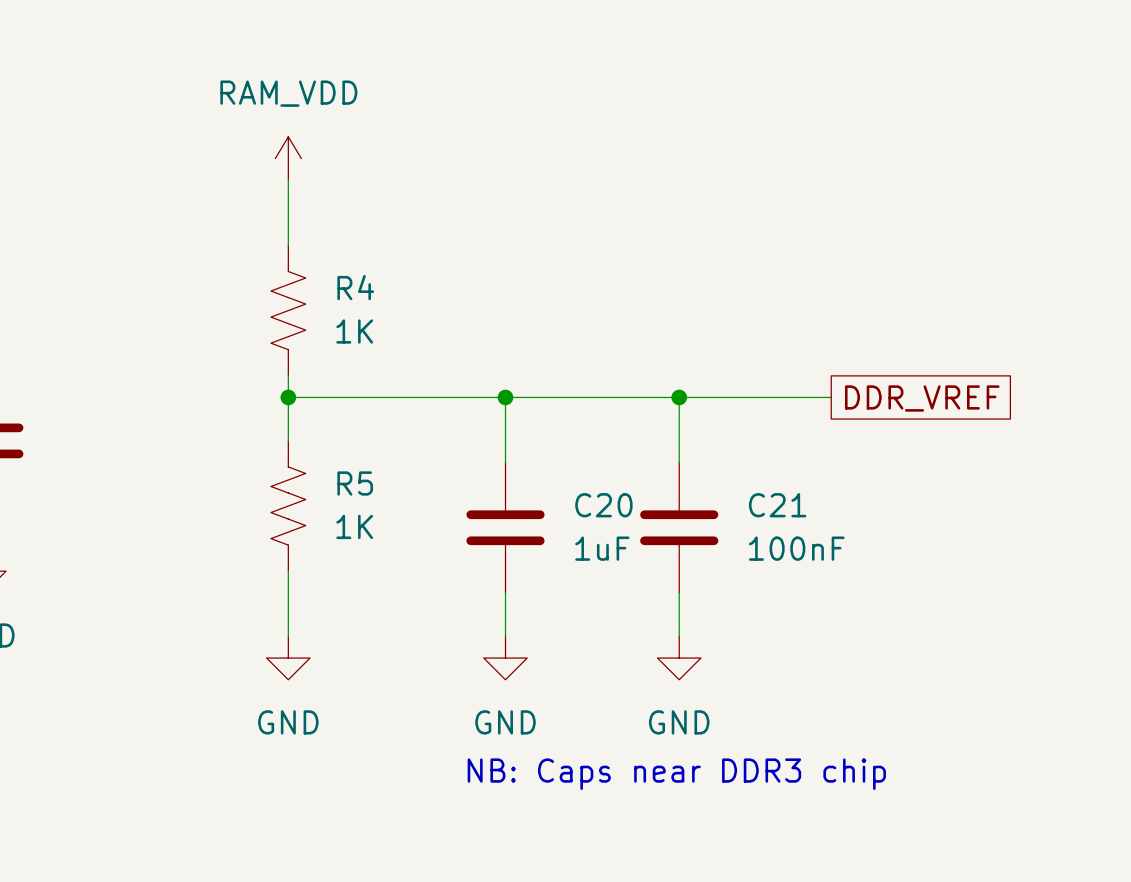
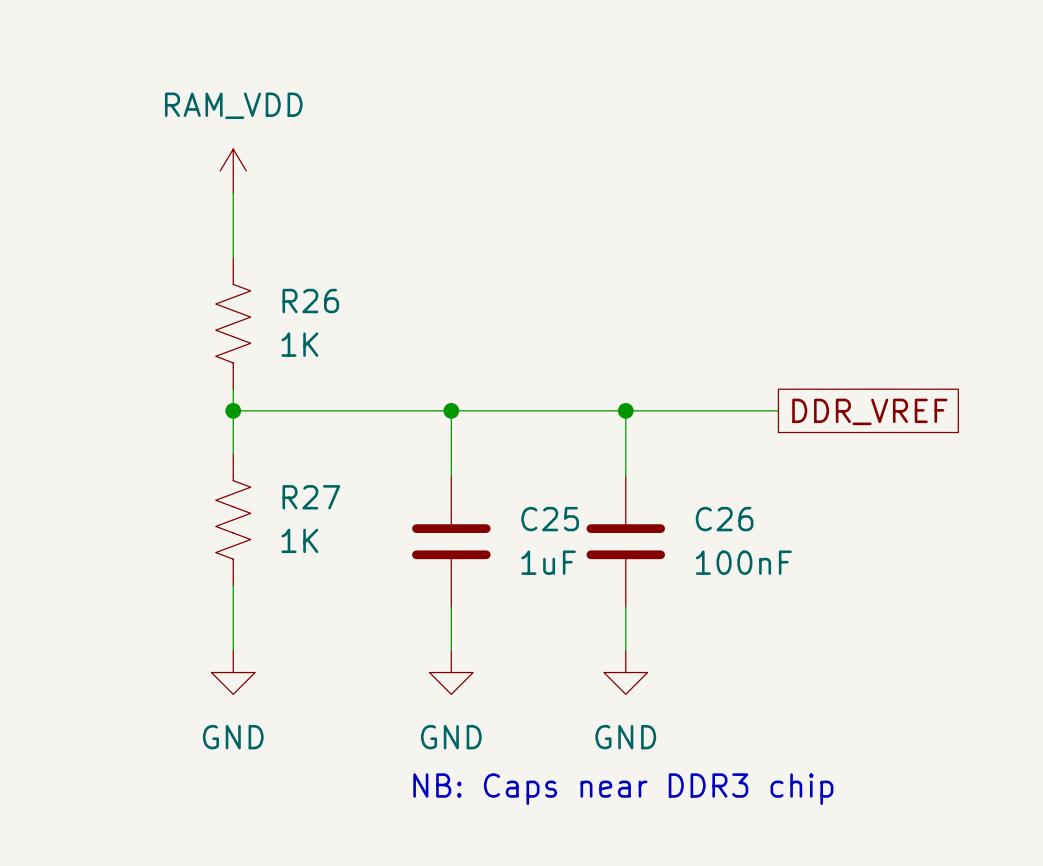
R4 name: R4 (355, 287) -> R26 (310, 301)
R5 name: R5 (355, 483) -> R27 (311, 497)
C20 name: C20 (603, 505) -> C25 (550, 519)
C21 name: C21 (777, 505) -> C26 (724, 519)

